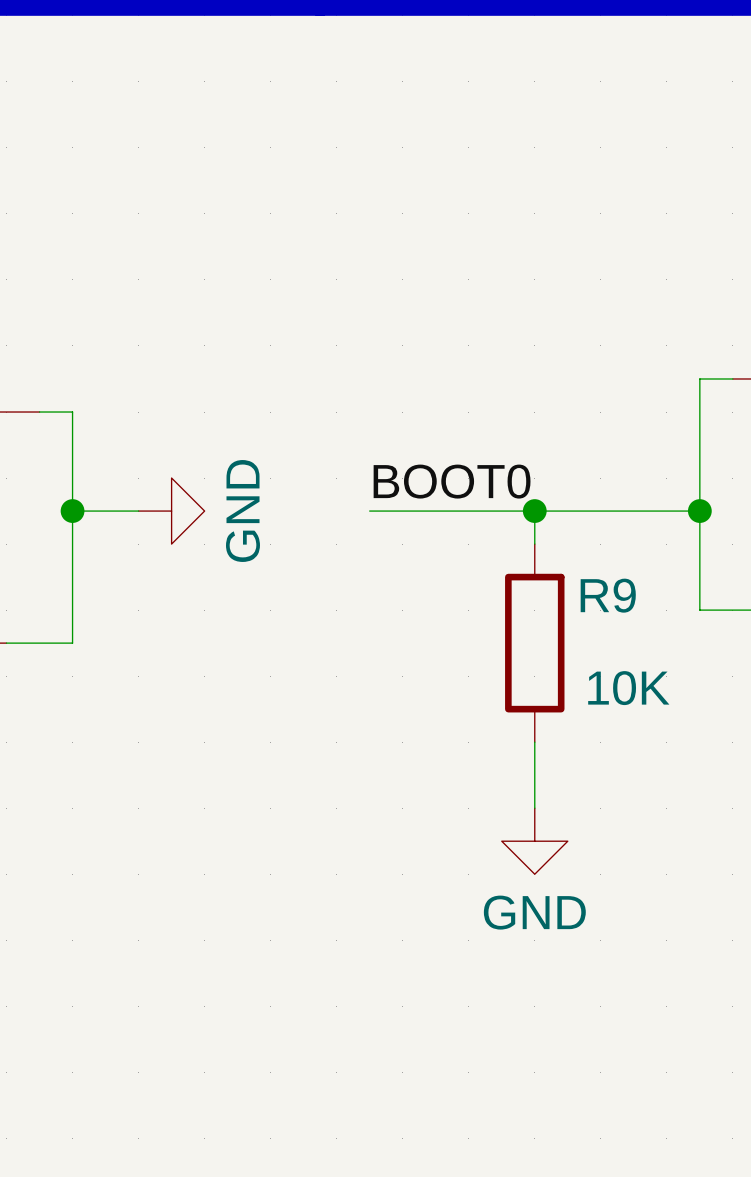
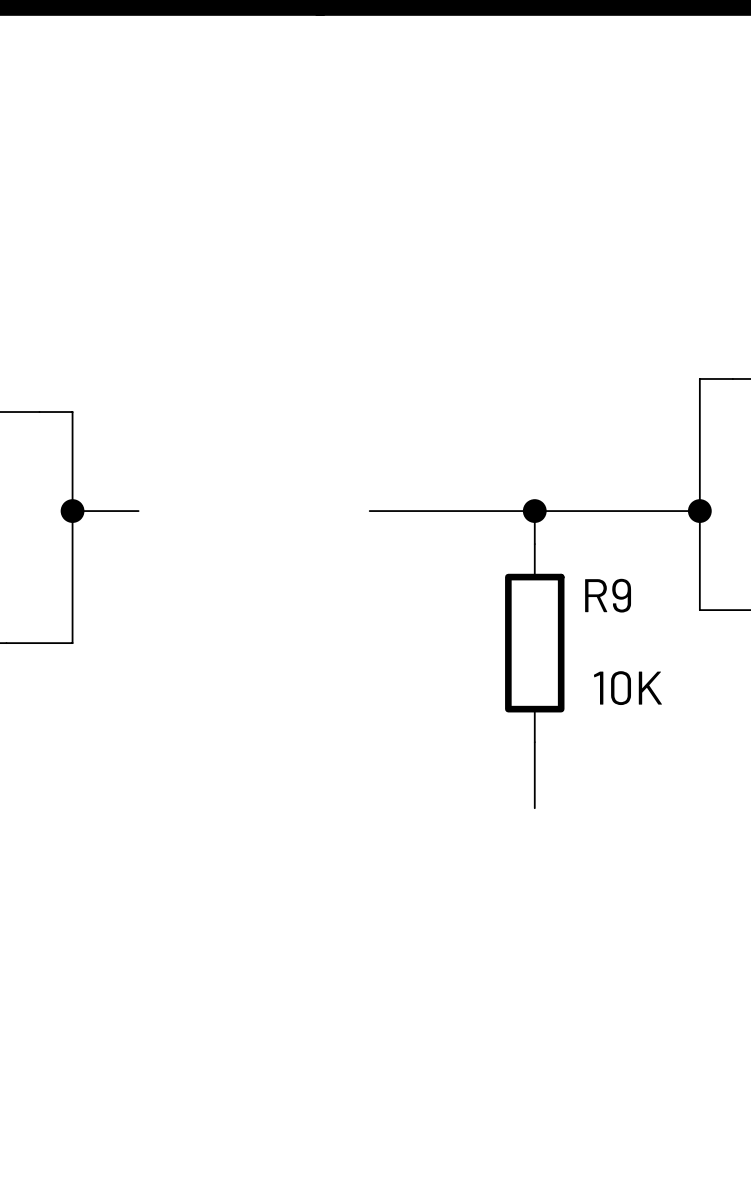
label: BOOT0 (452, 481) -> none
power symbol: GND (171, 511) -> none
power symbol: GND (534, 841) -> none

